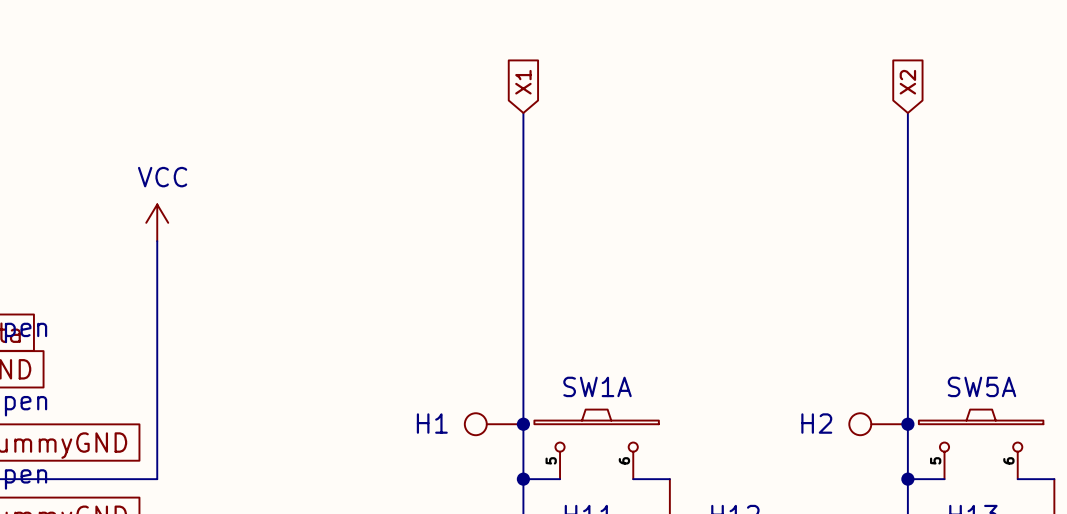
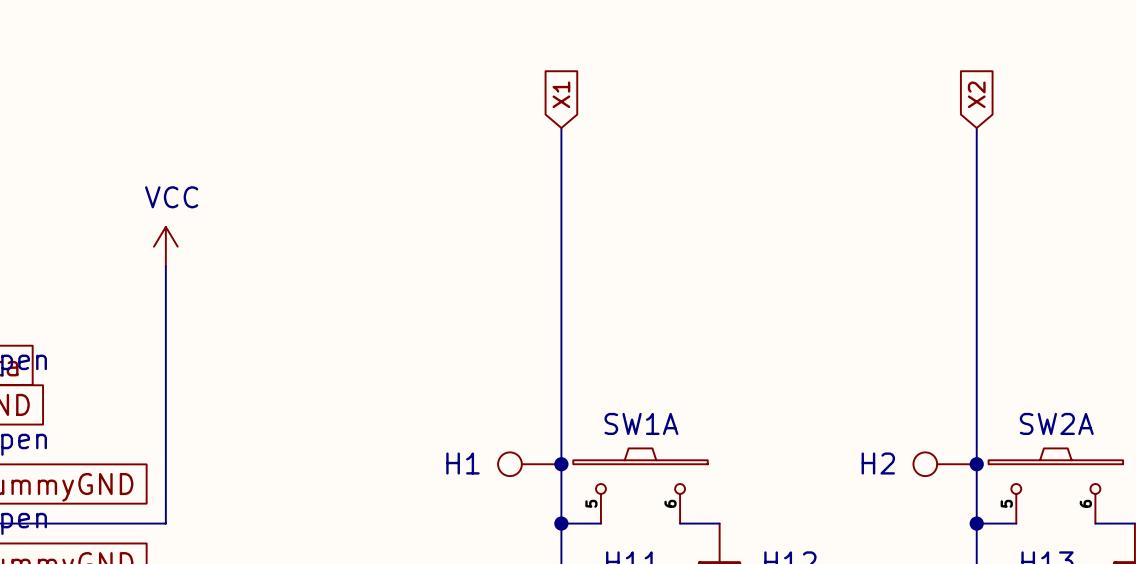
SW5A name: SW5A (981, 386) -> SW2A (1056, 423)

